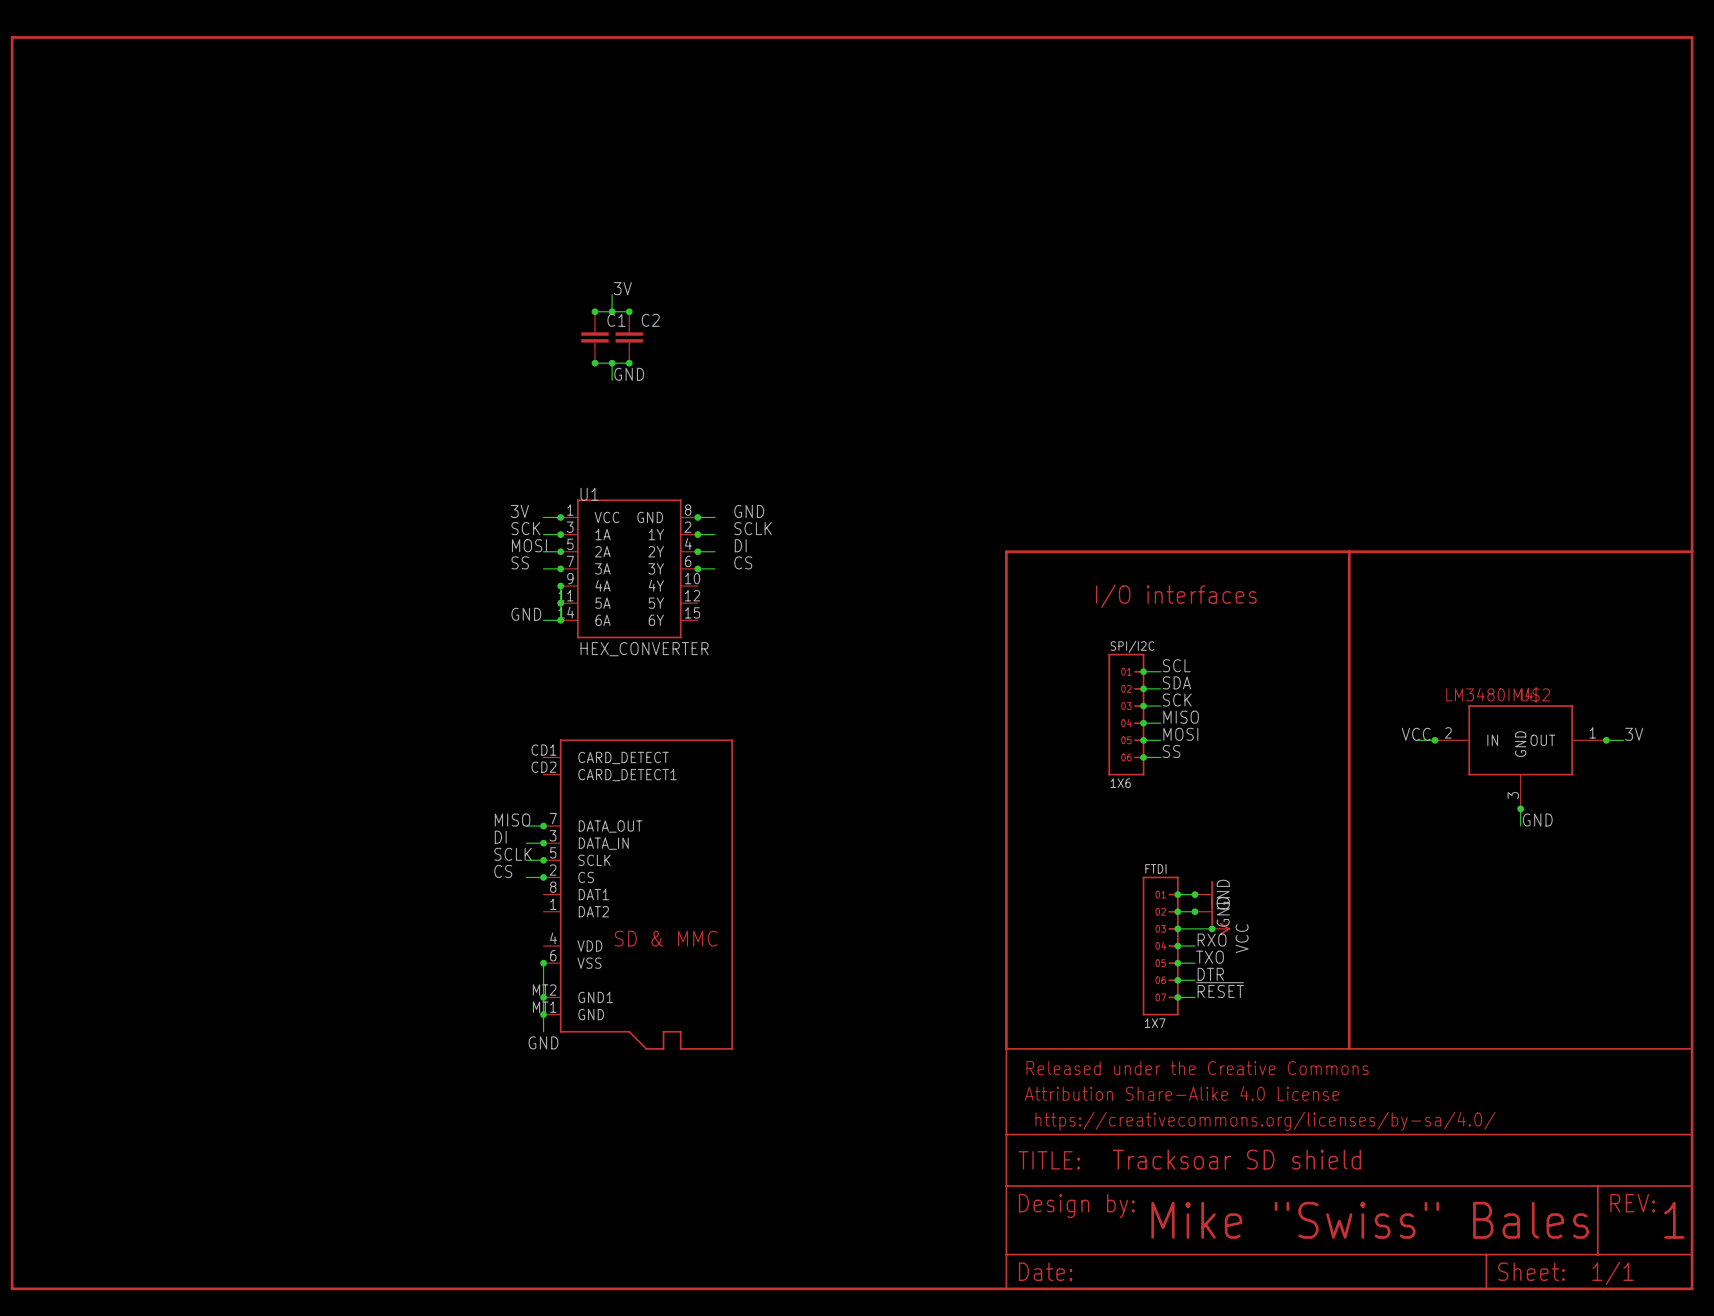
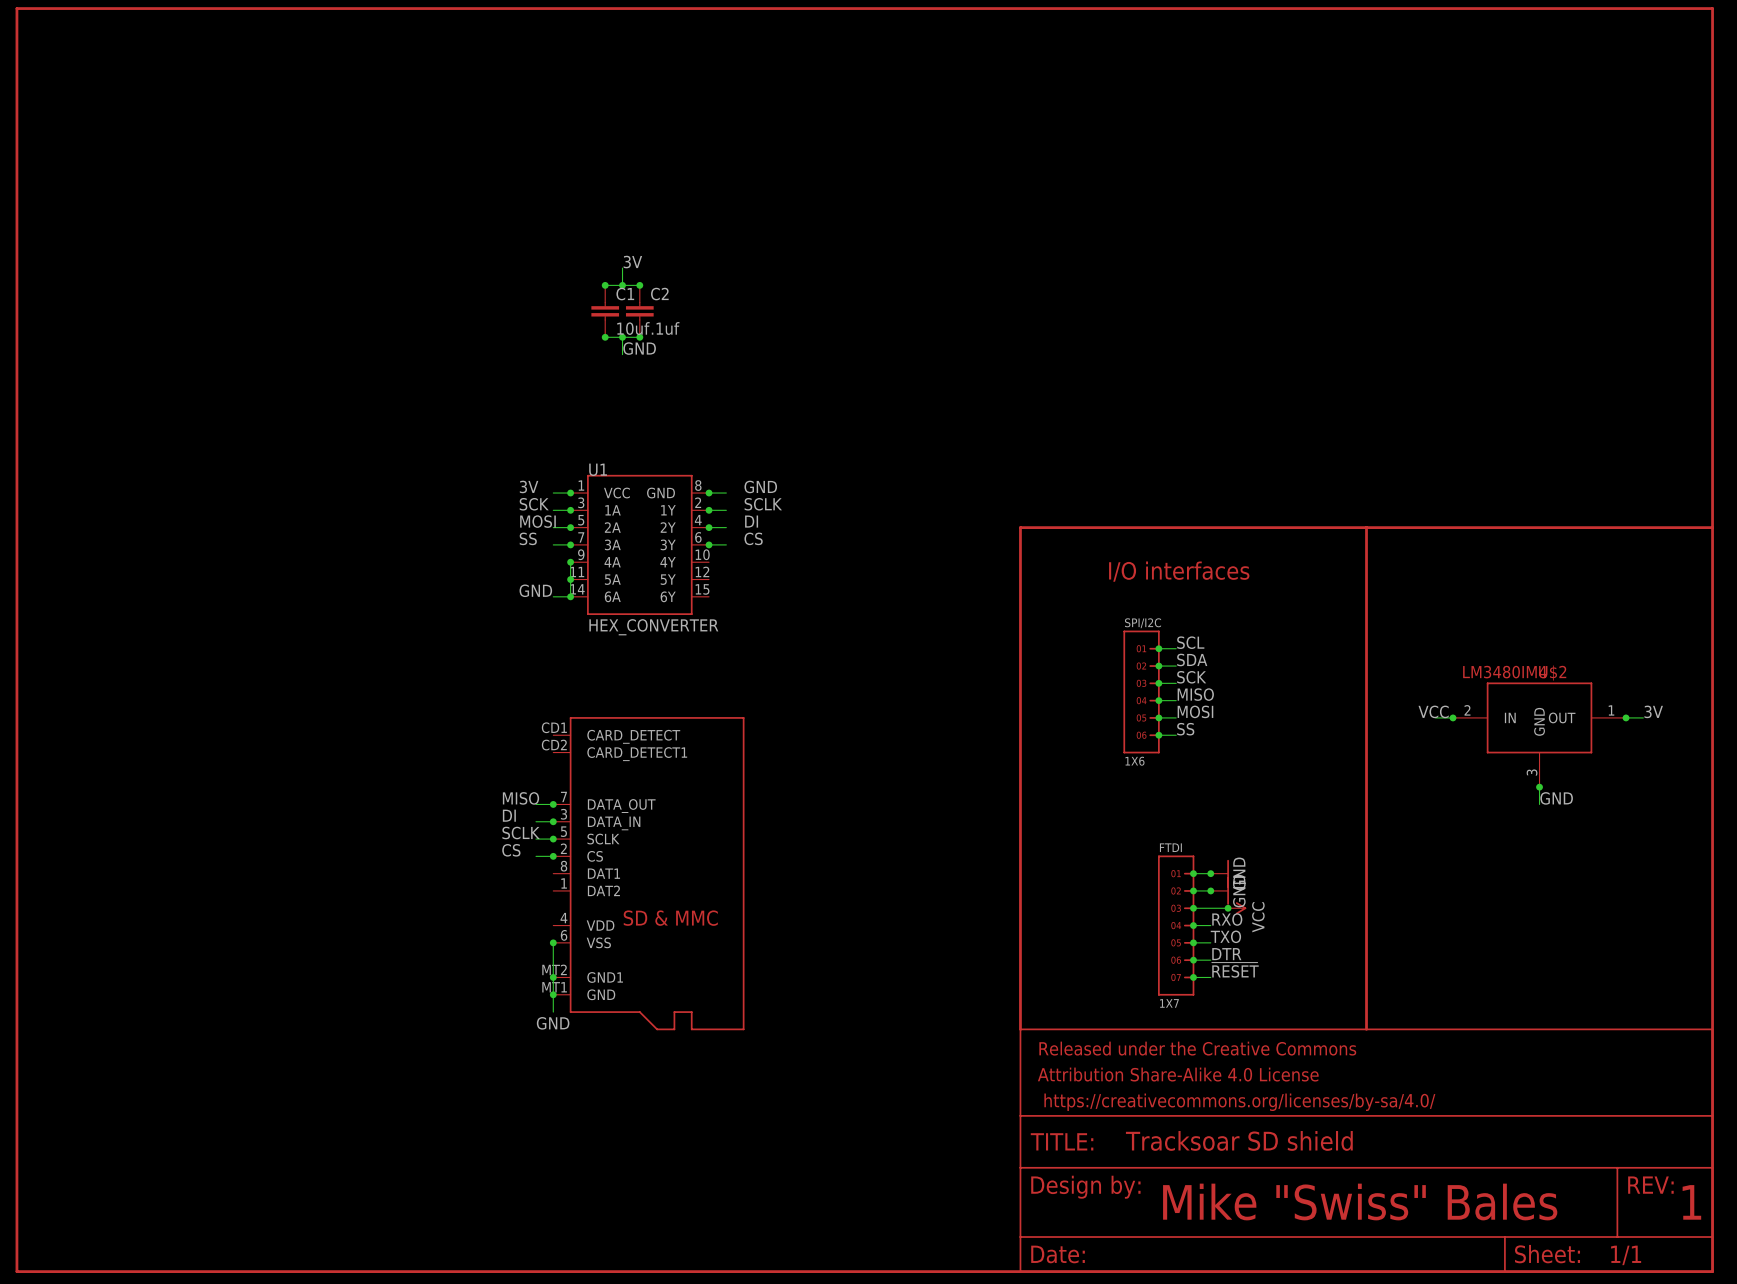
C1 value: none -> 10uf (633, 328)
C2 value: none -> .1uf (665, 328)

